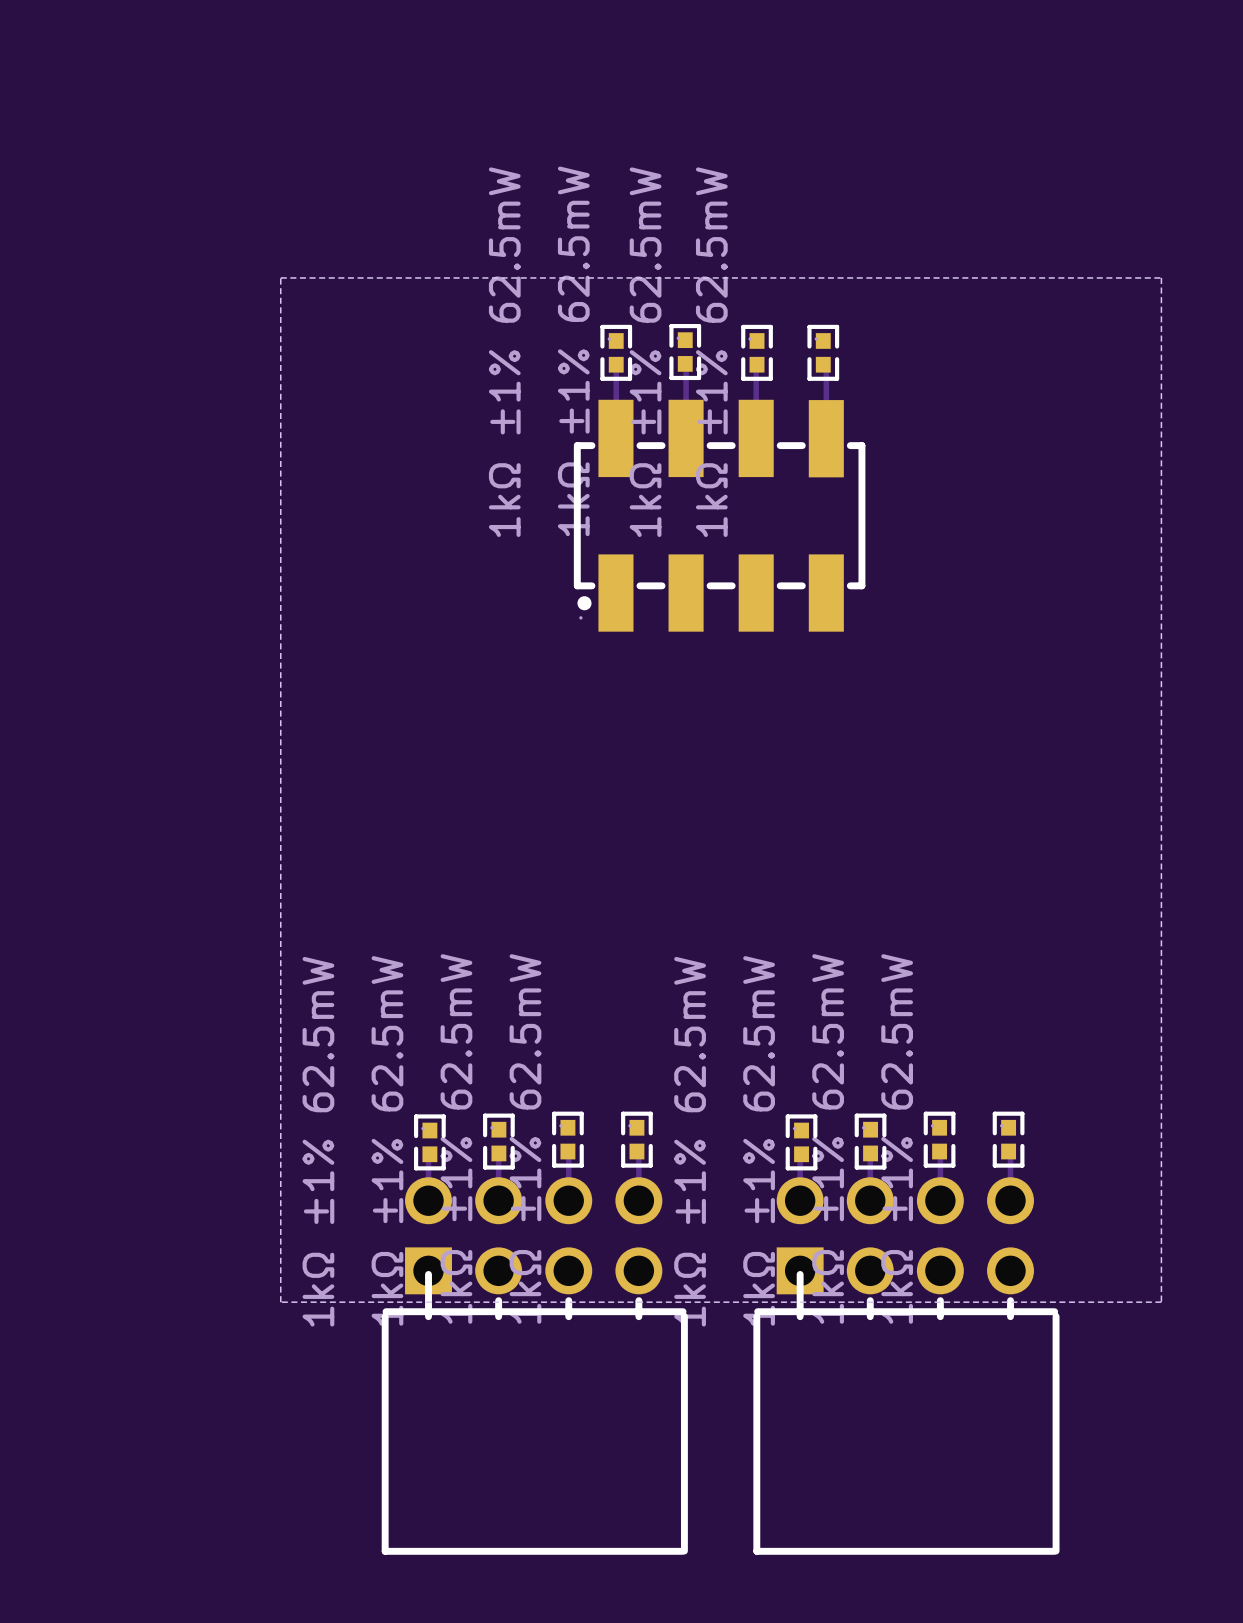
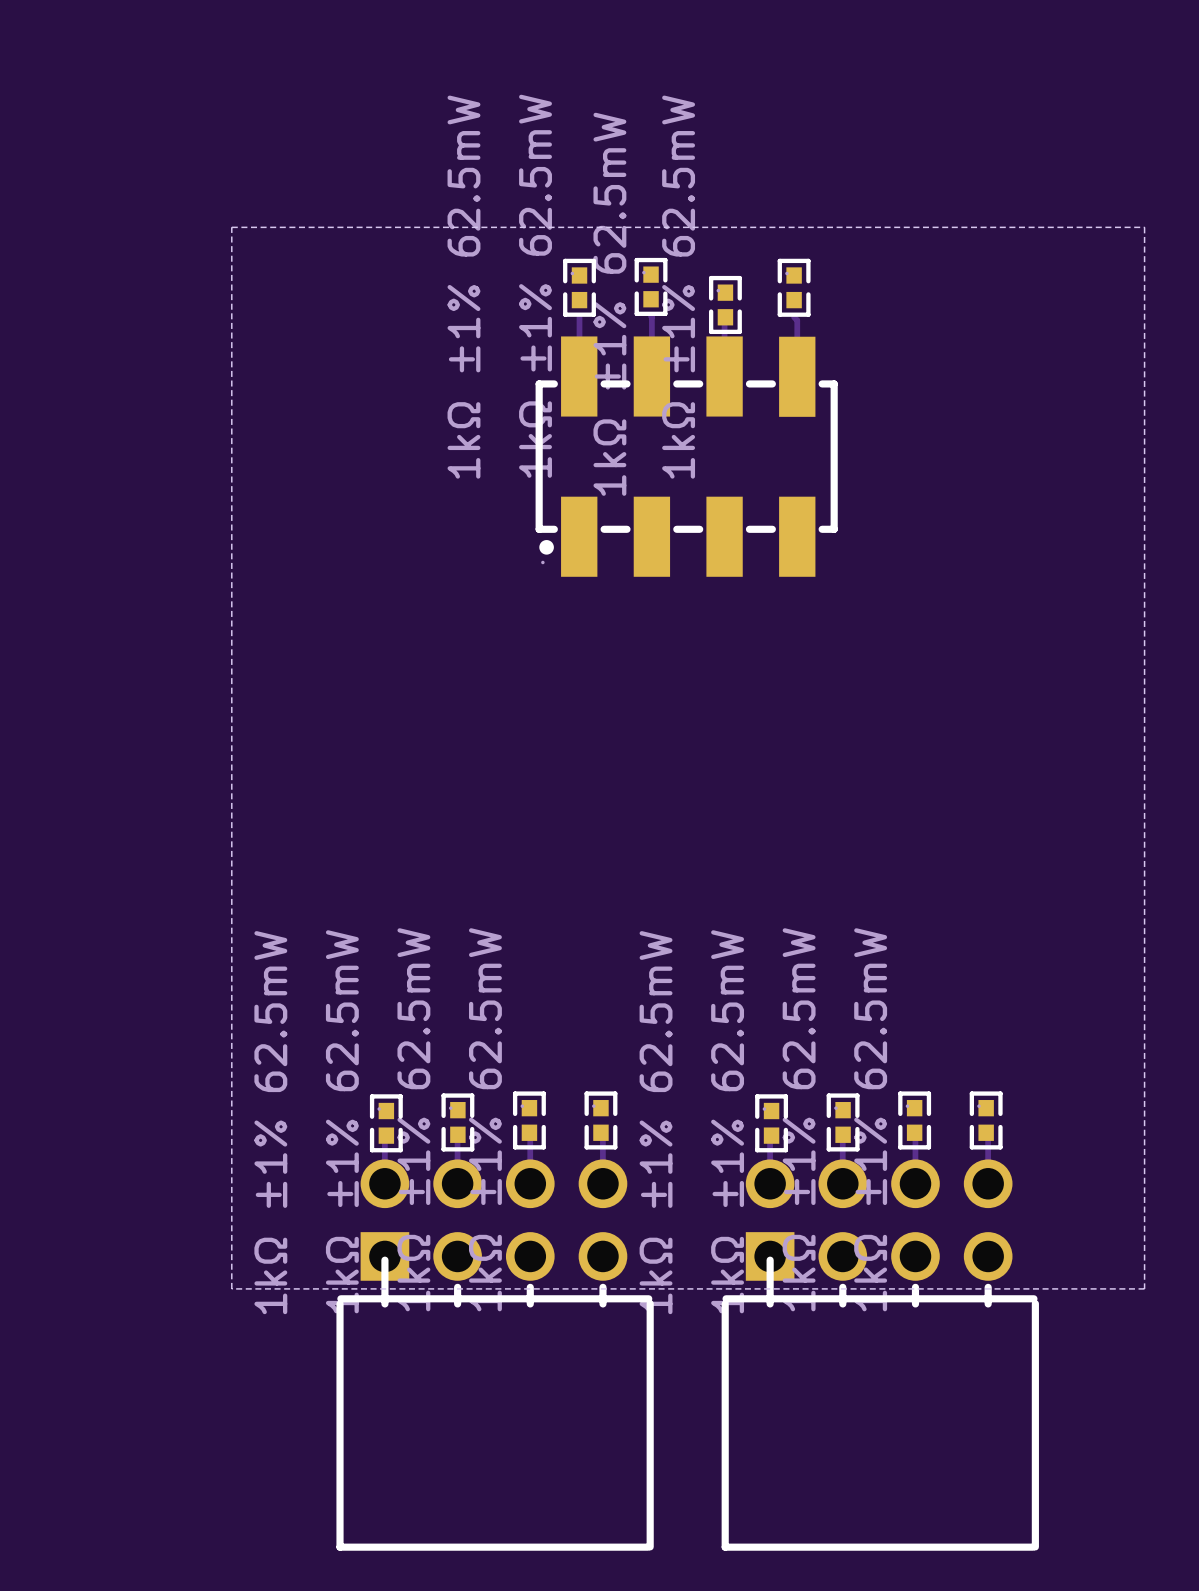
part position: (616, 352) -> (579, 287)
part position: (685, 352) -> (651, 286)
part position: (823, 352) -> (794, 287)
part position: (719, 515) -> (686, 456)

